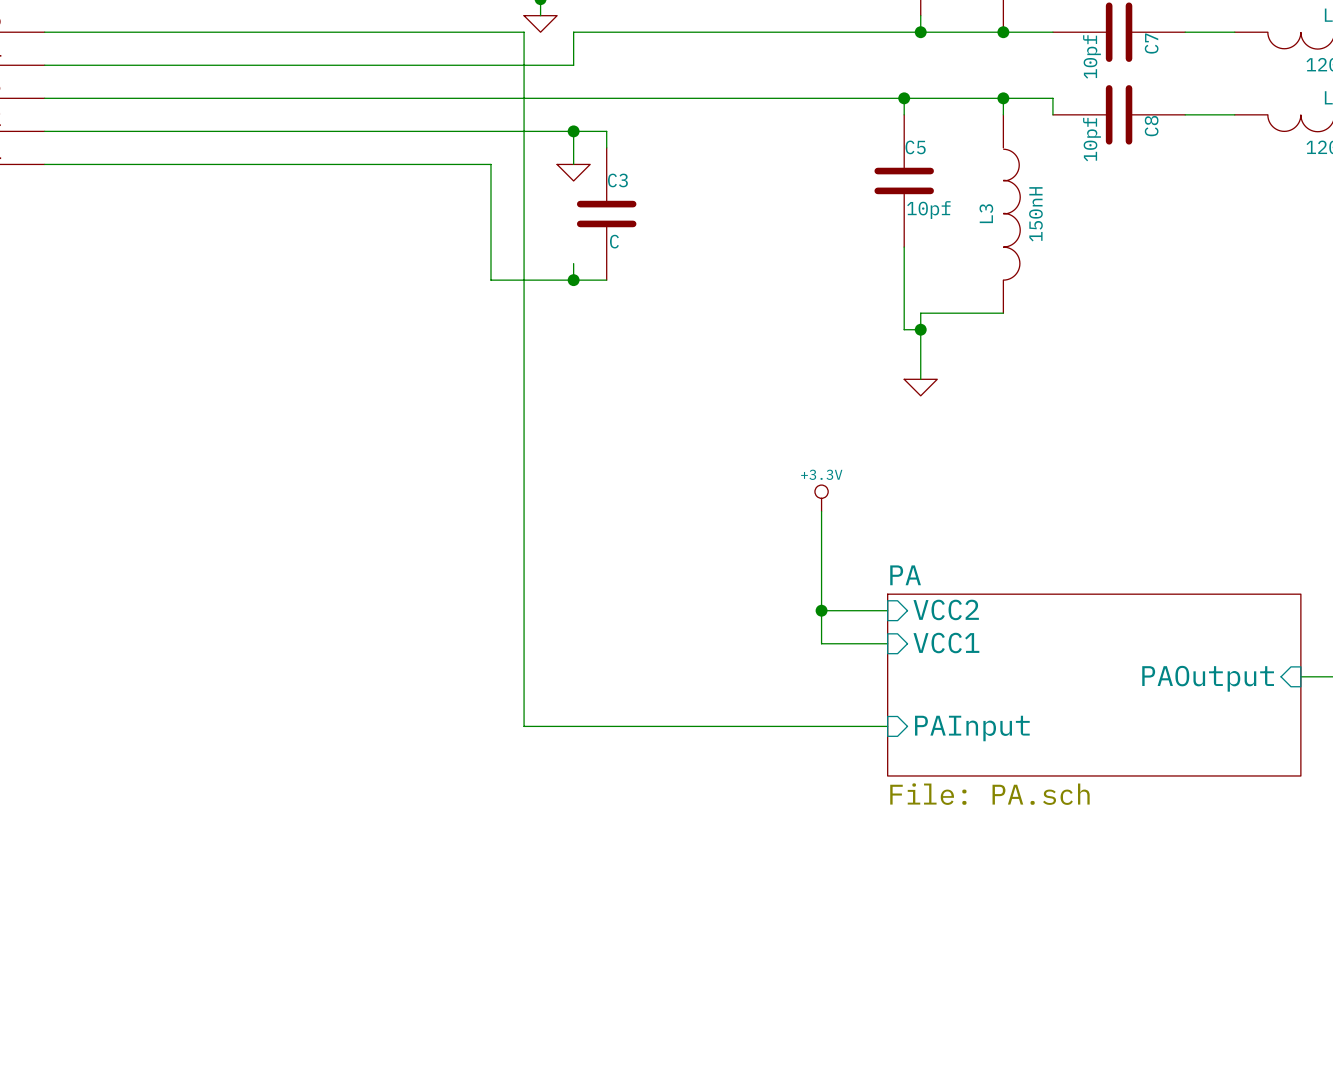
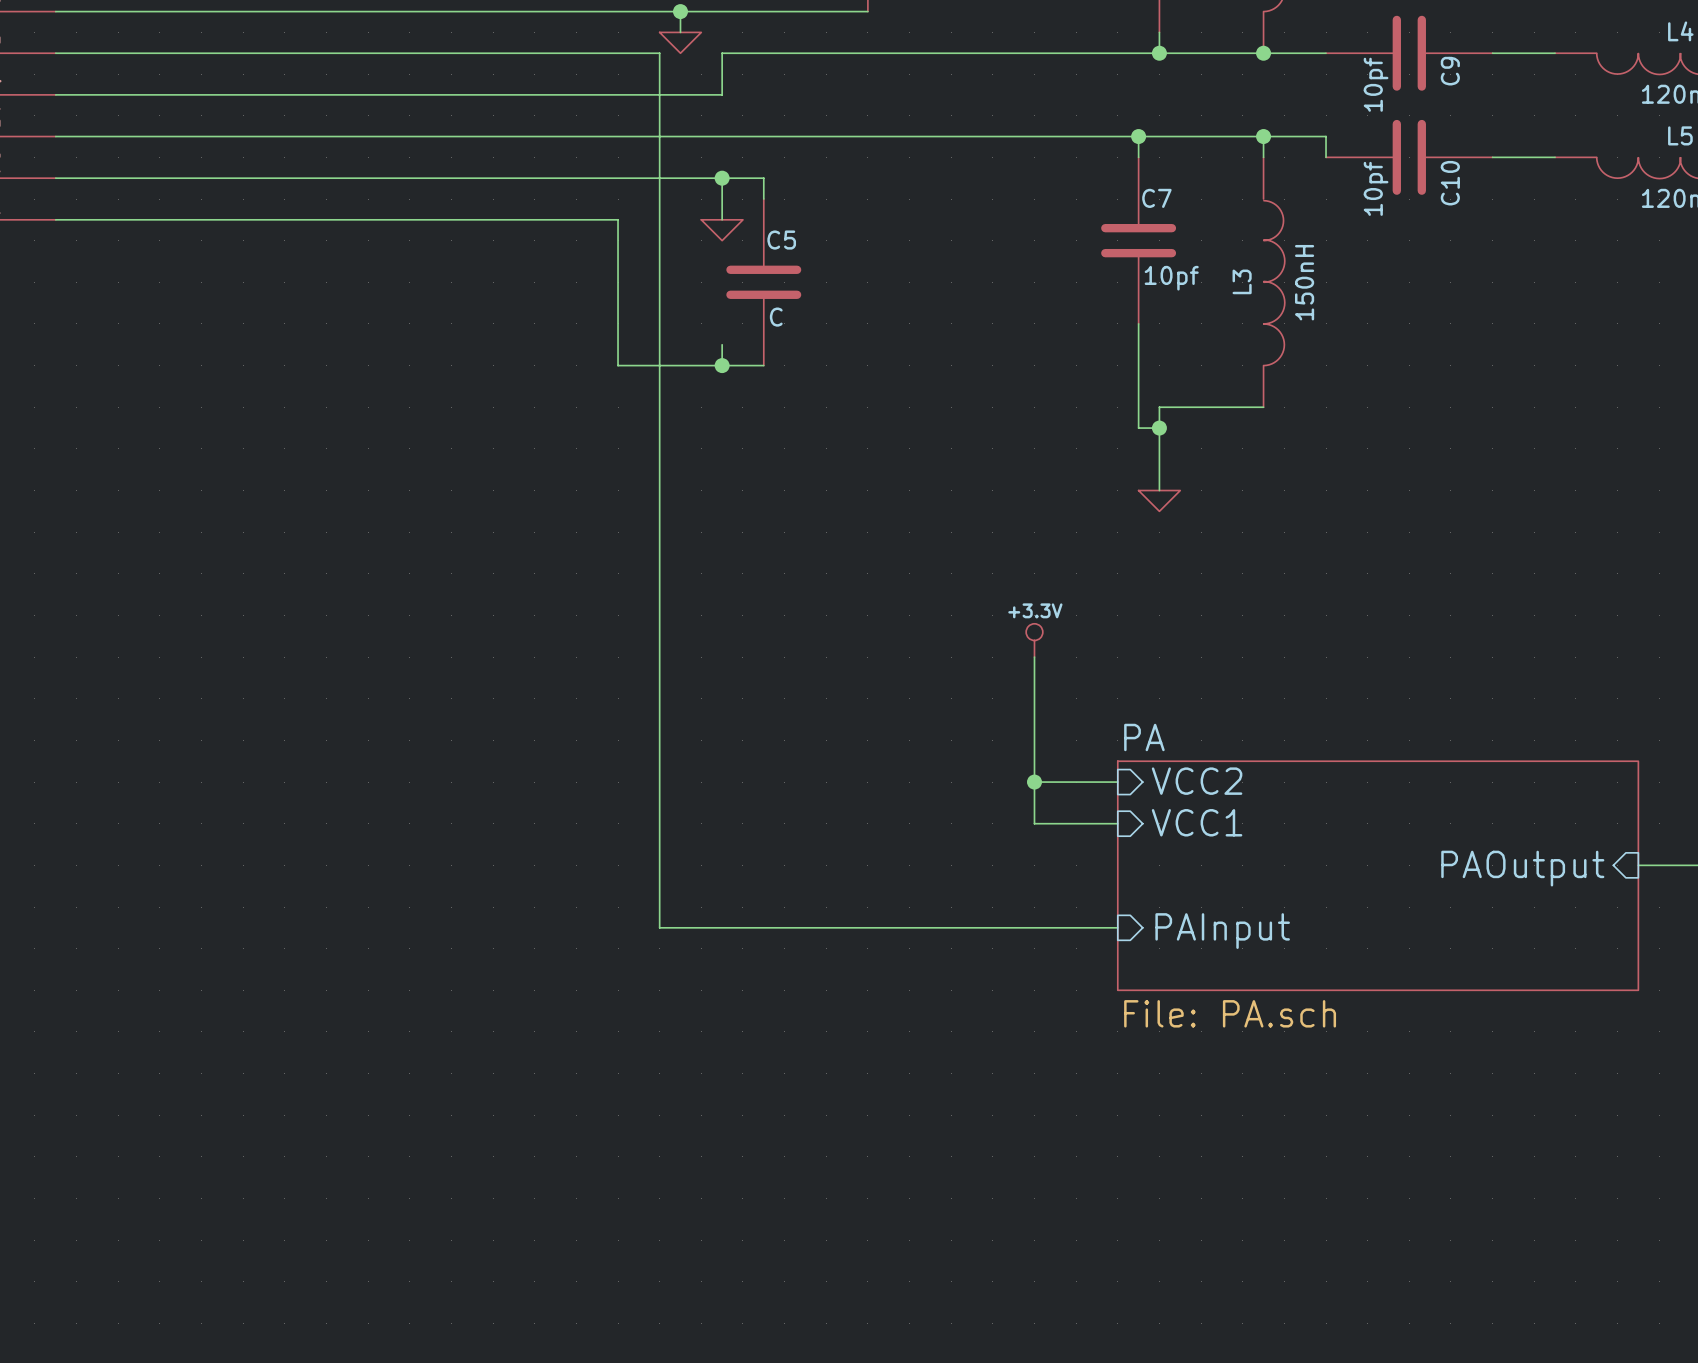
C7 name: C7 (1151, 43) -> C9 (1450, 71)
C8 name: C8 (1151, 126) -> C10 (1450, 183)
C5 name: C5 (915, 147) -> C7 (1156, 198)
C3 name: C3 (617, 180) -> C5 (781, 240)

